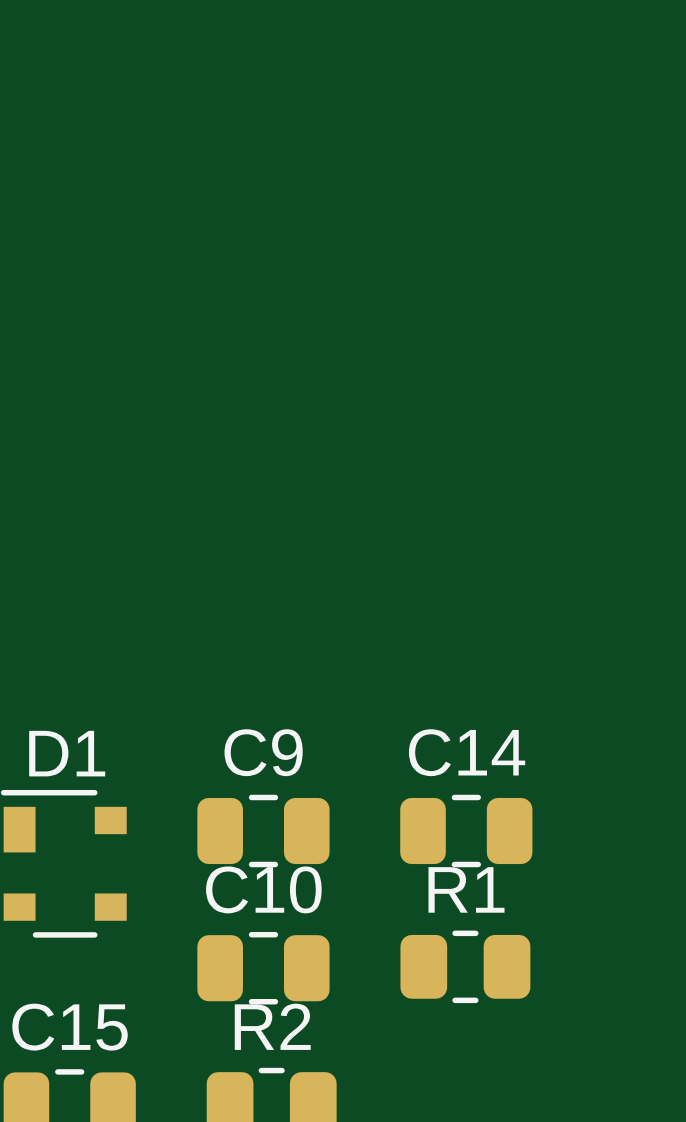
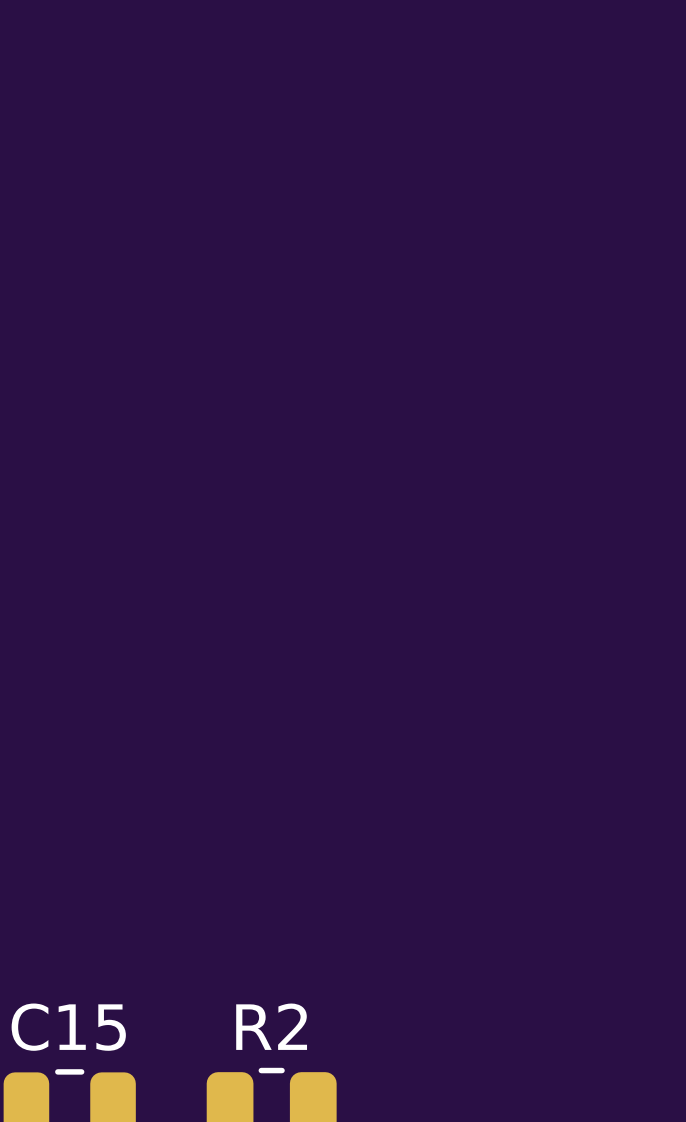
C9: (263, 831) -> none
C14: (466, 831) -> none
D1: (63, 863) -> none
R1: (465, 966) -> none
C10: (263, 968) -> none

